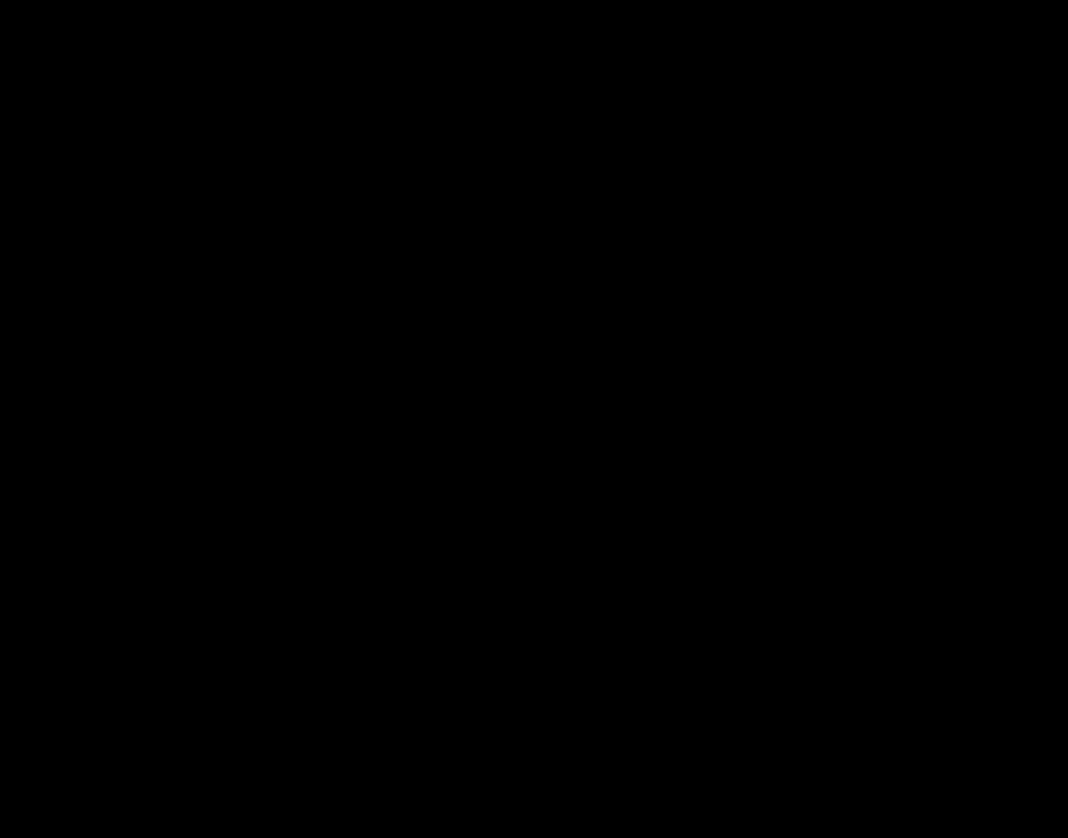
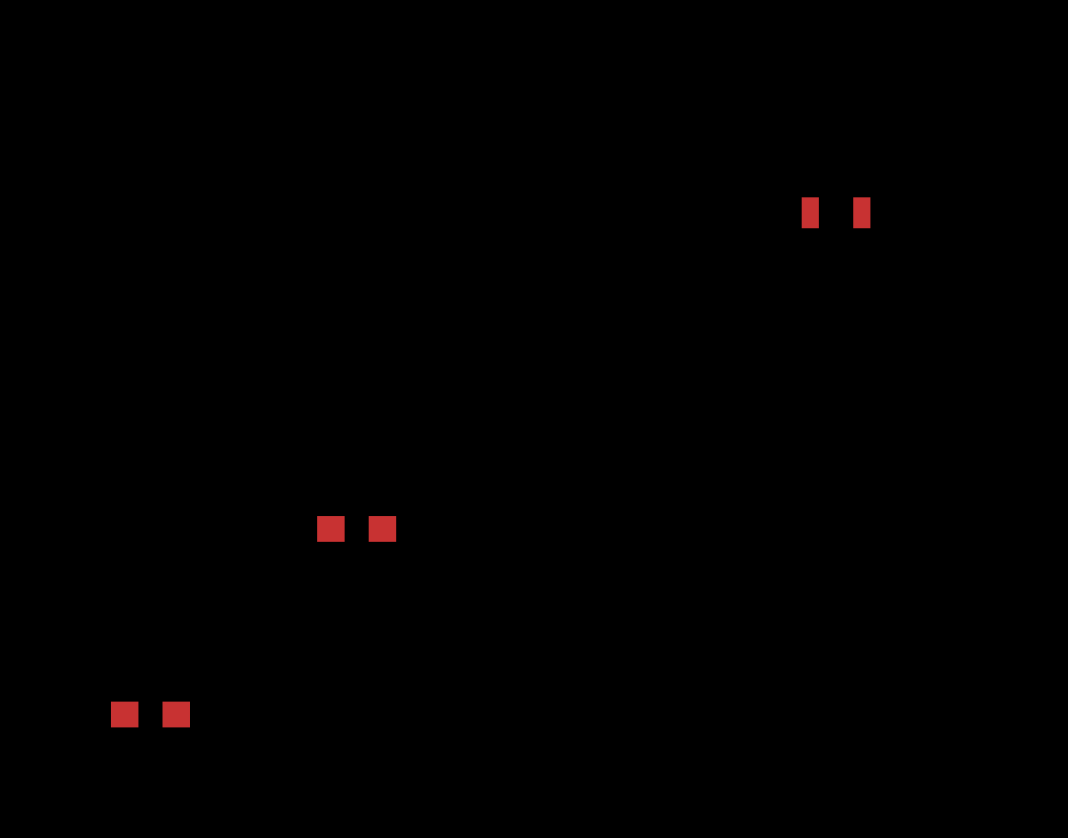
part: none -> (836, 212)
part: none -> (356, 528)
part: none -> (150, 714)

